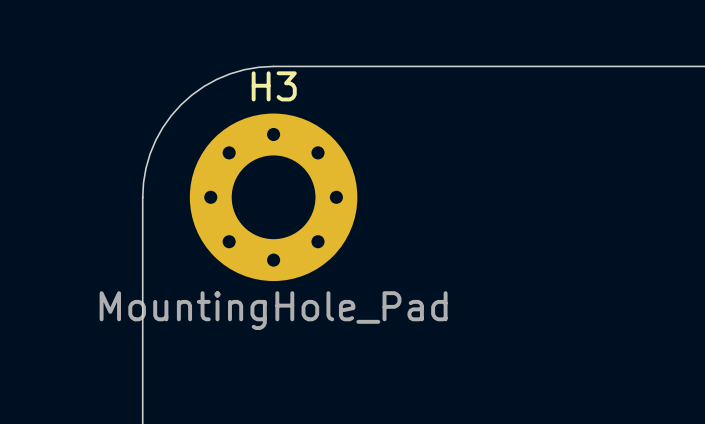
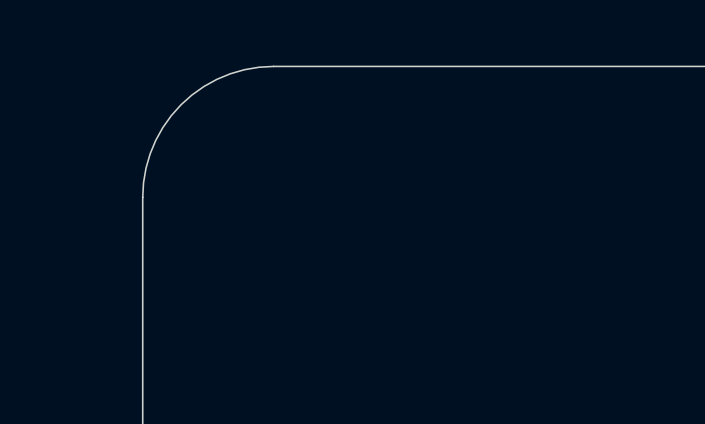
H3: MountingHole_Pad (273, 197) -> none

